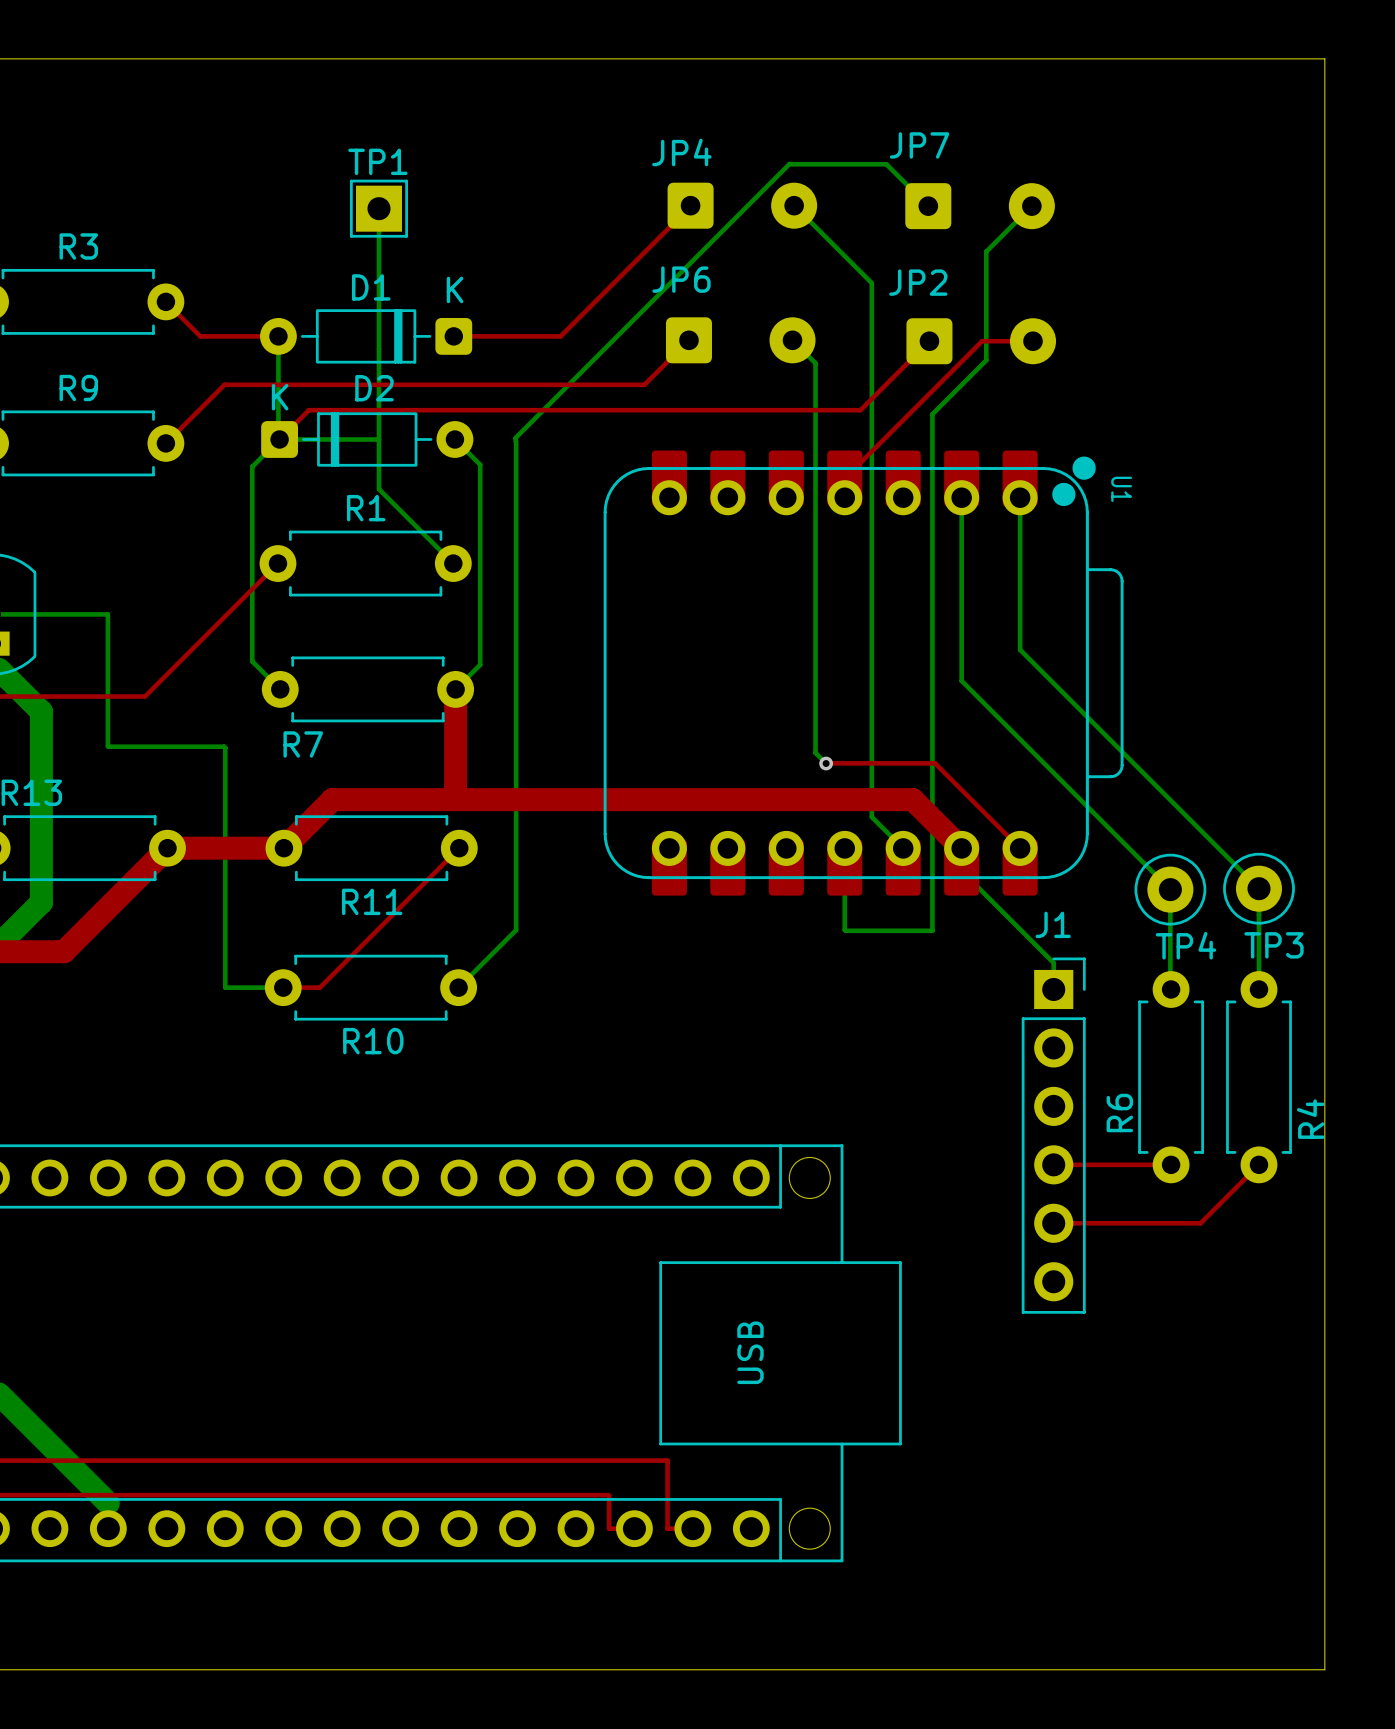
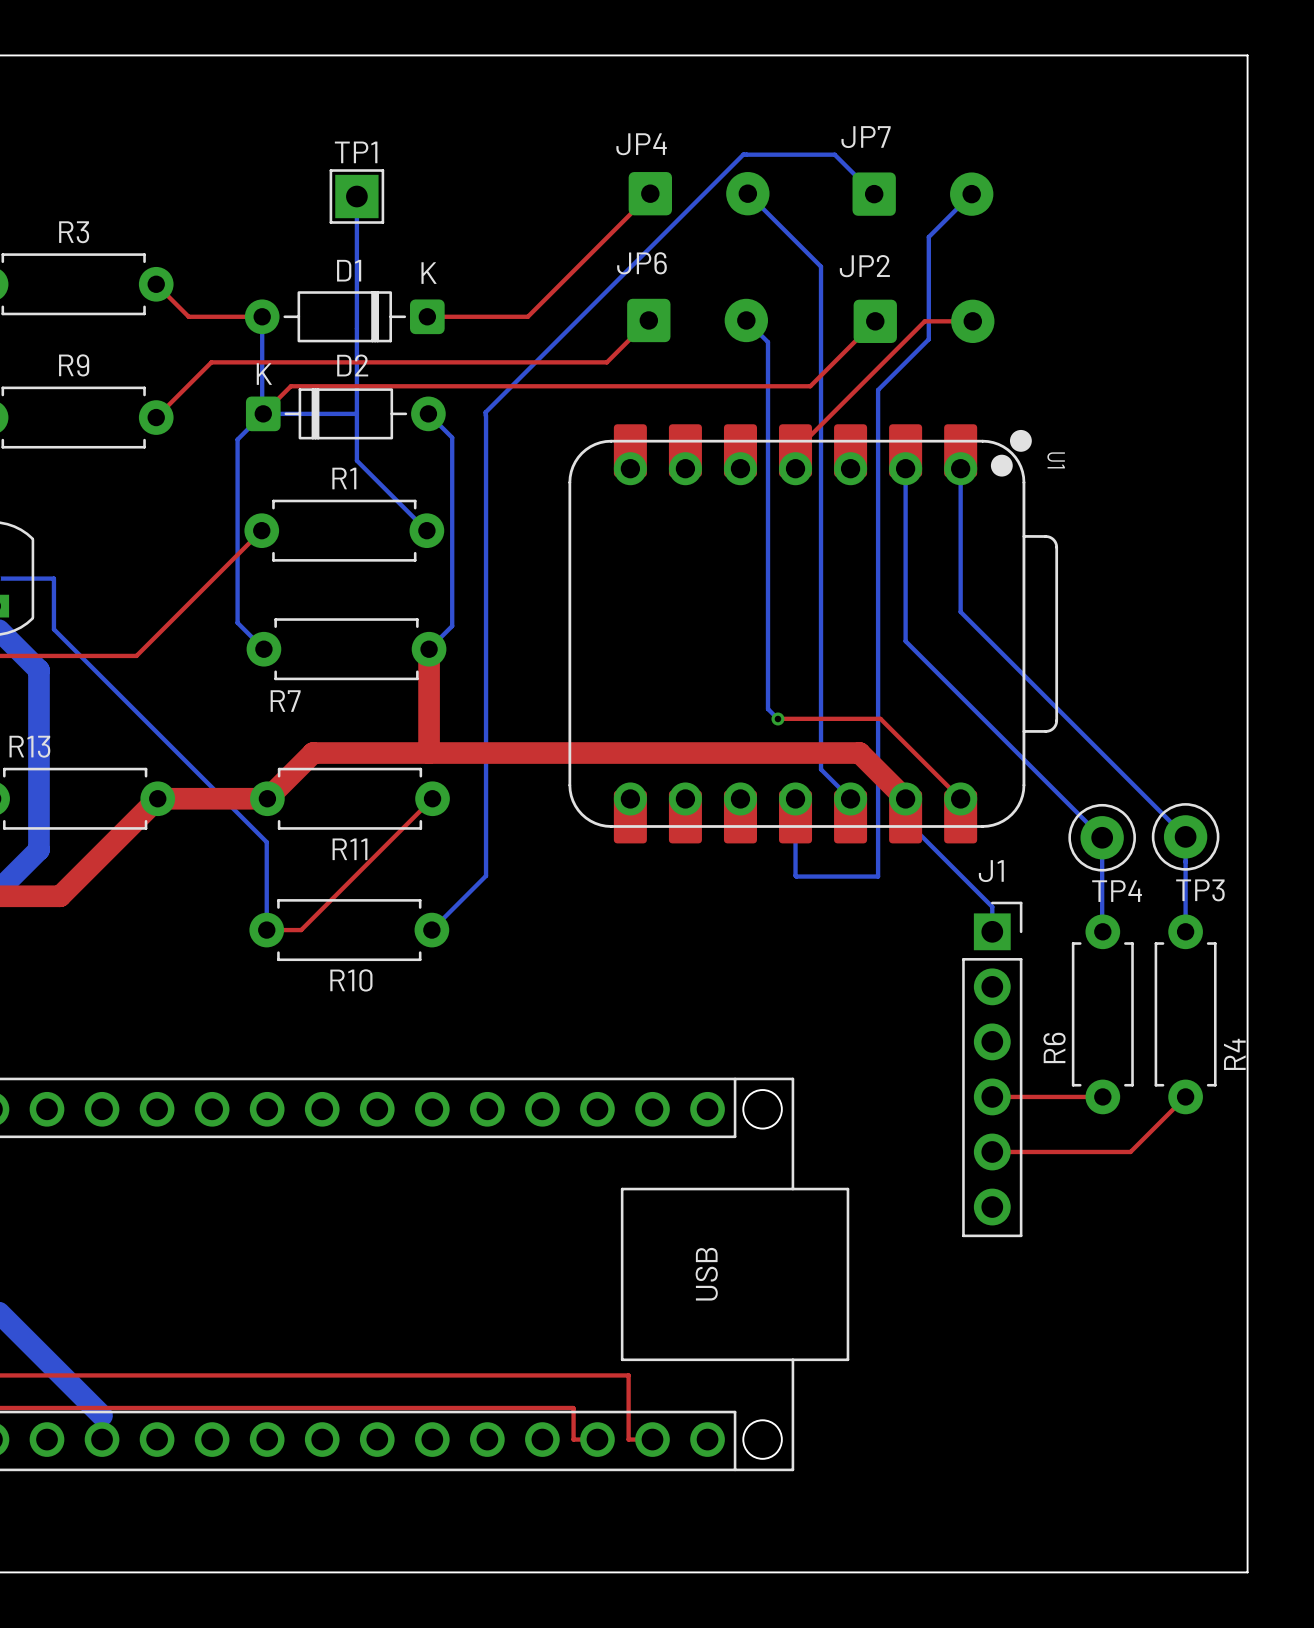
bottom track: (57, 614) (107, 614) (108, 746) (225, 747) (225, 987) (283, 987) -> (53, 578) (53, 629) (266, 842) (266, 930)

